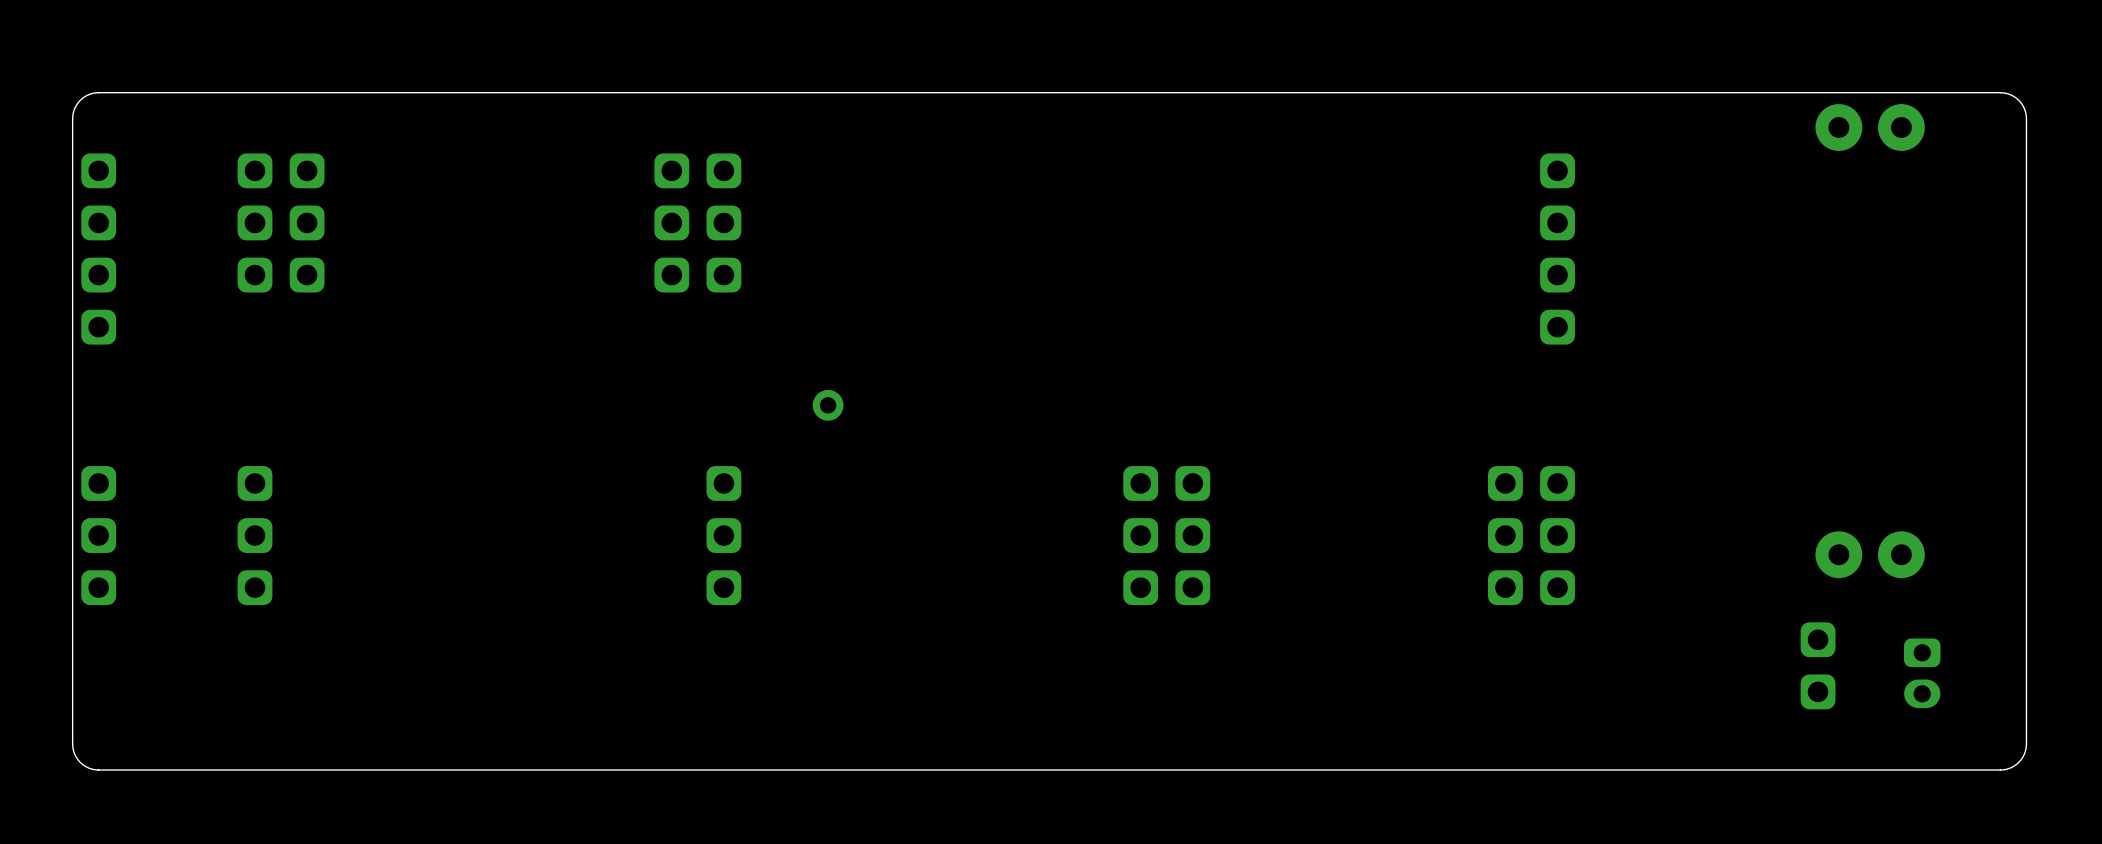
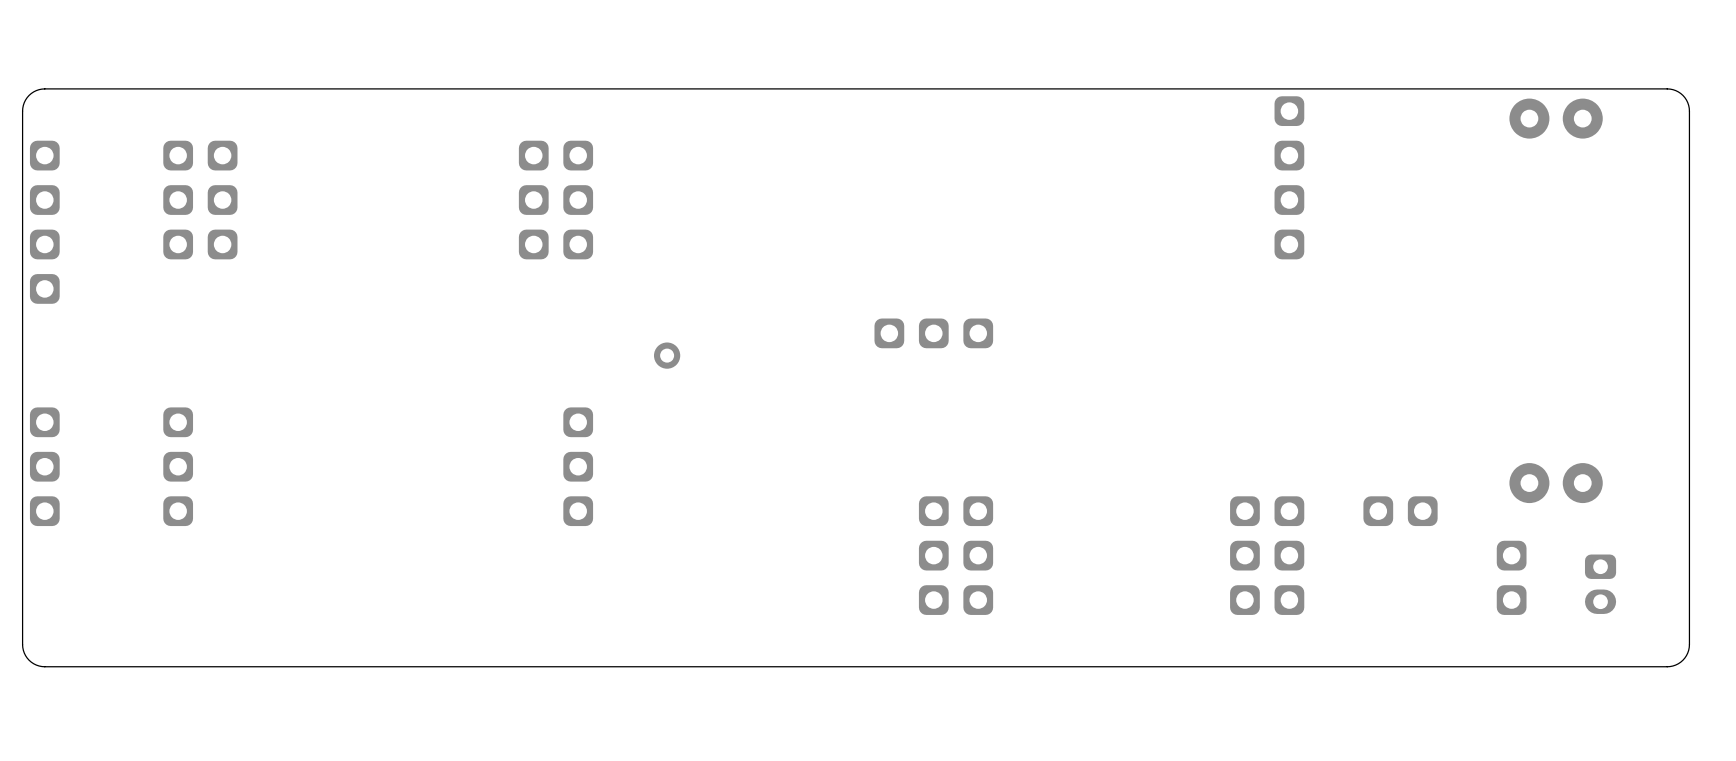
part position: (1557, 249) -> (1289, 177)
part: none -> (933, 333)
part: (1140, 535) -> none
part: (1192, 535) -> none
part: (1505, 535) -> none
part: (1557, 535) -> none
part: none -> (1400, 511)
part: none -> (933, 555)
part: none -> (978, 555)
part: none -> (1244, 555)
part: none -> (1289, 555)

